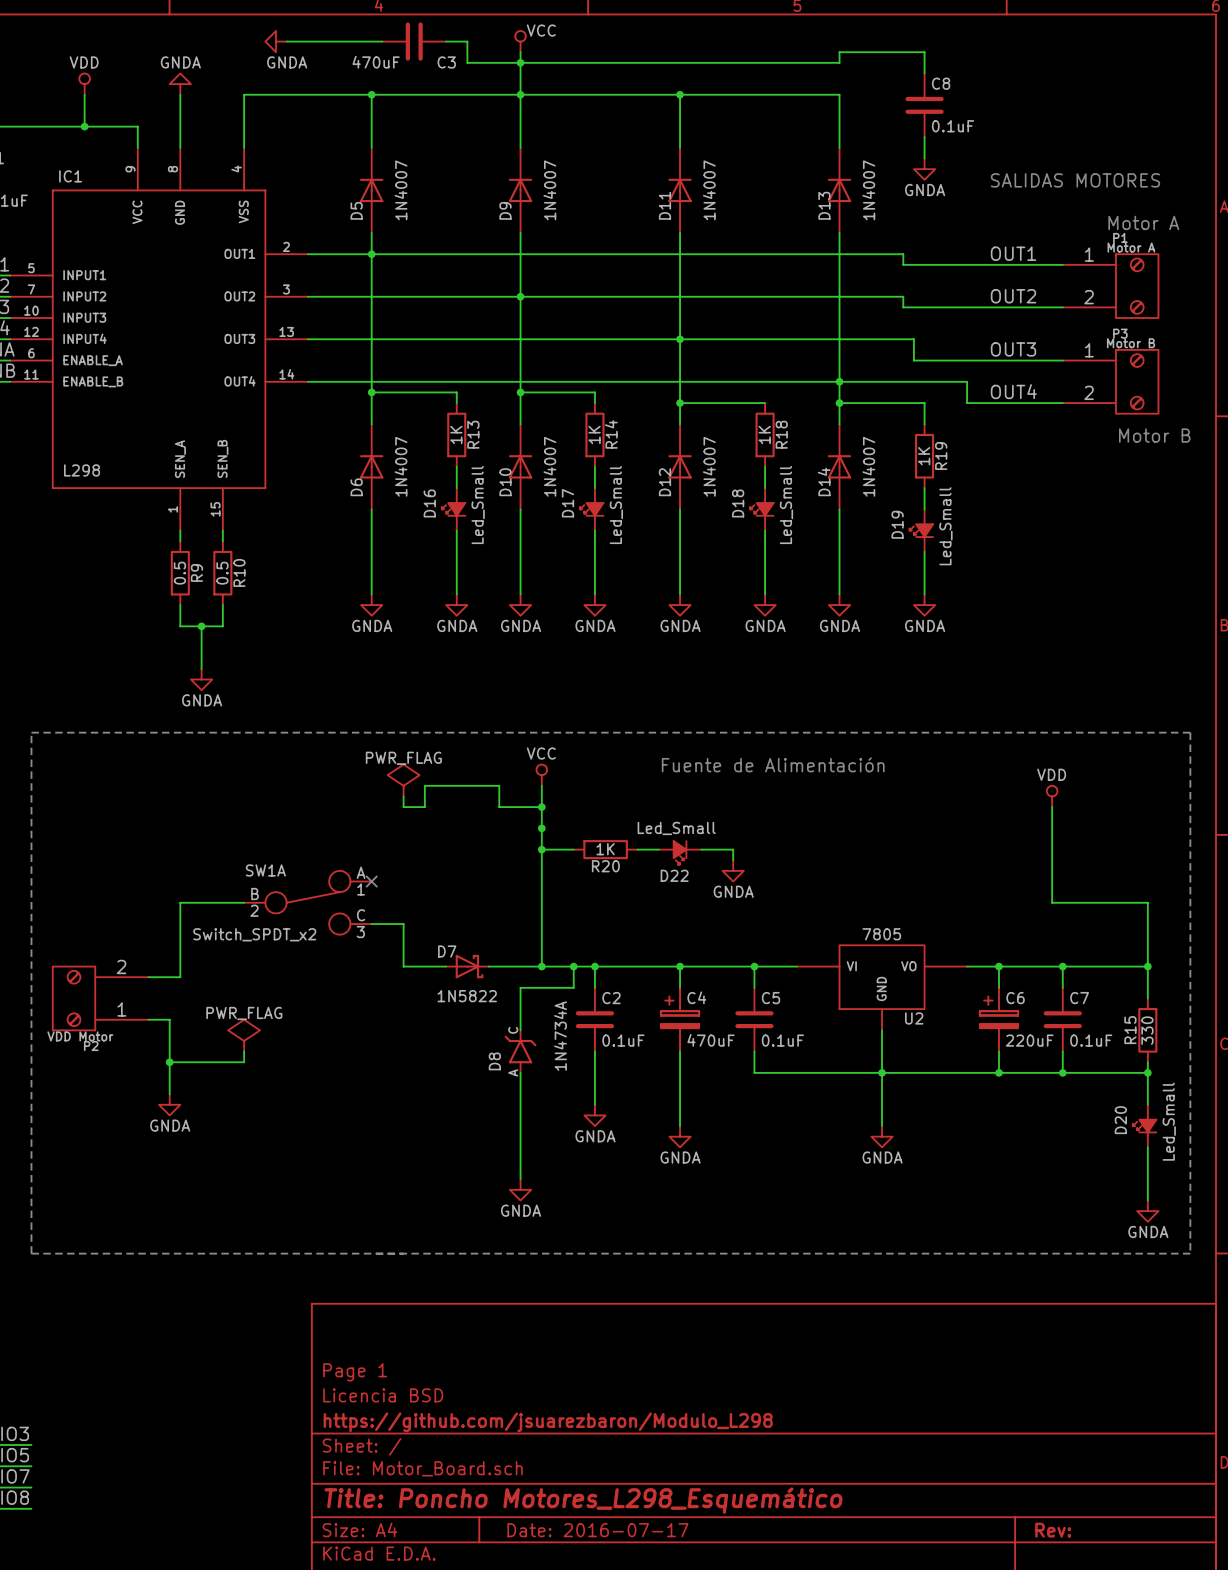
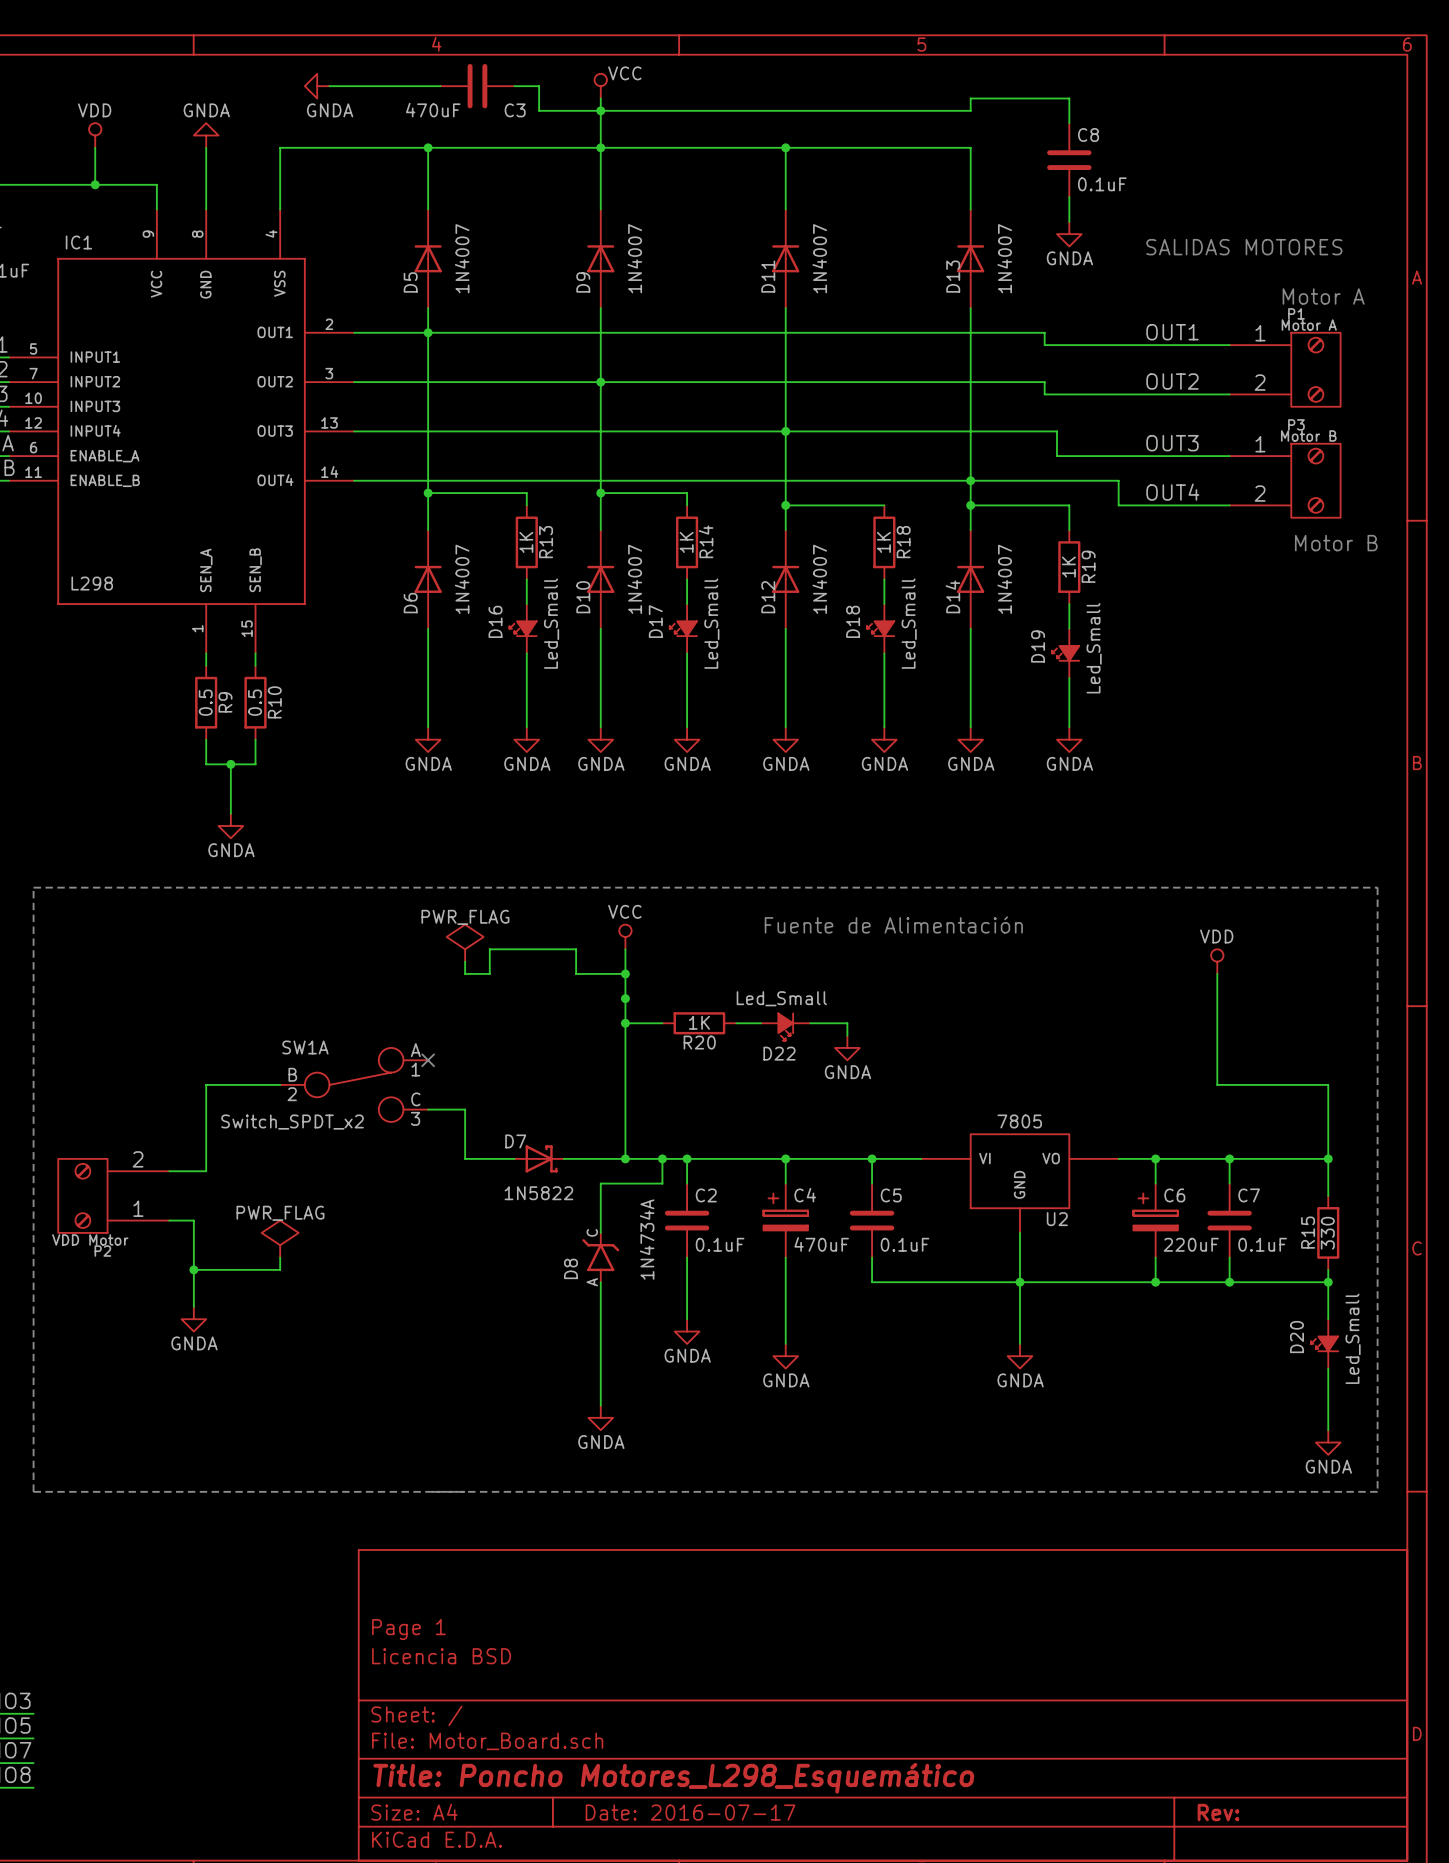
title block: https://github.com/jsuarezbaron/Modulo_L298 (548, 1422) -> none

